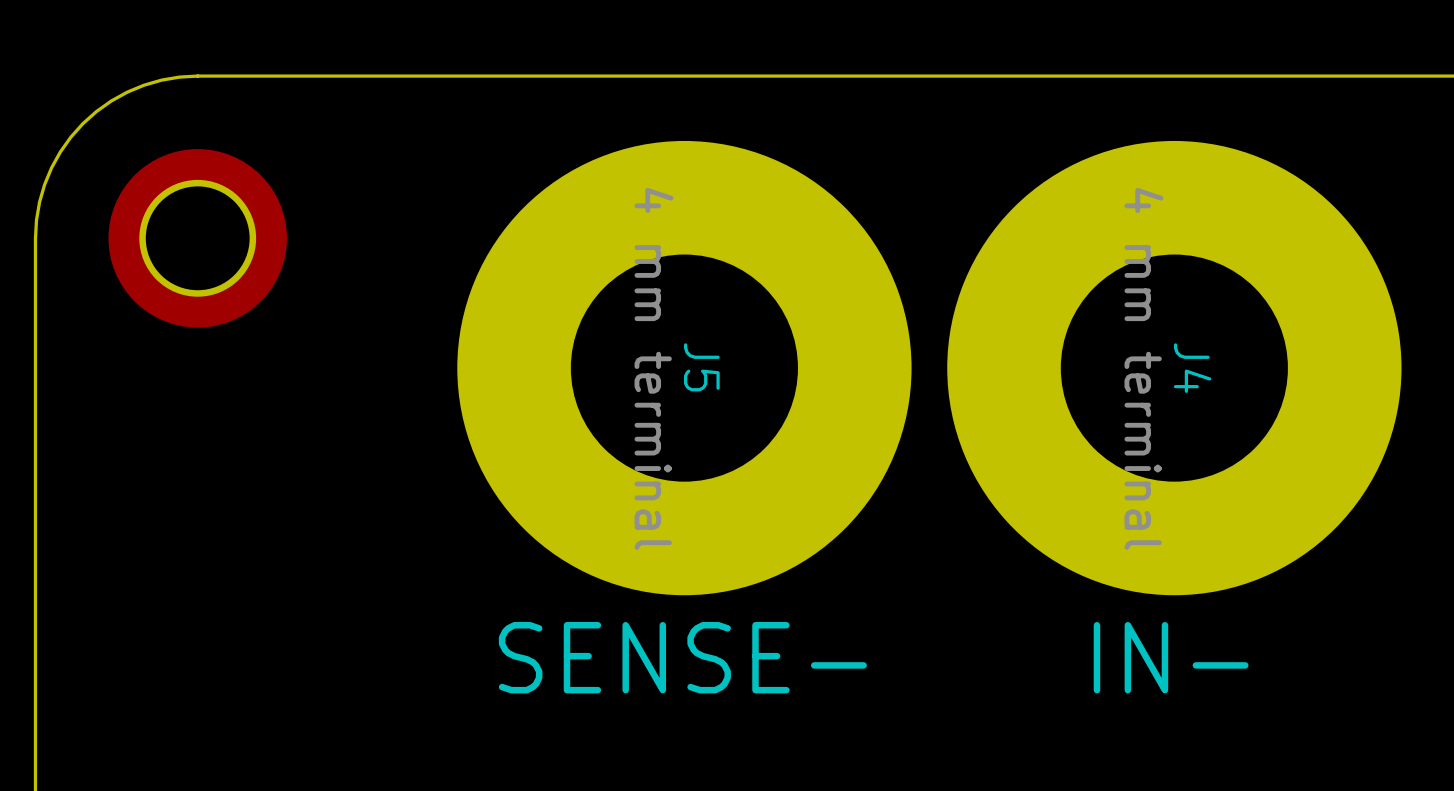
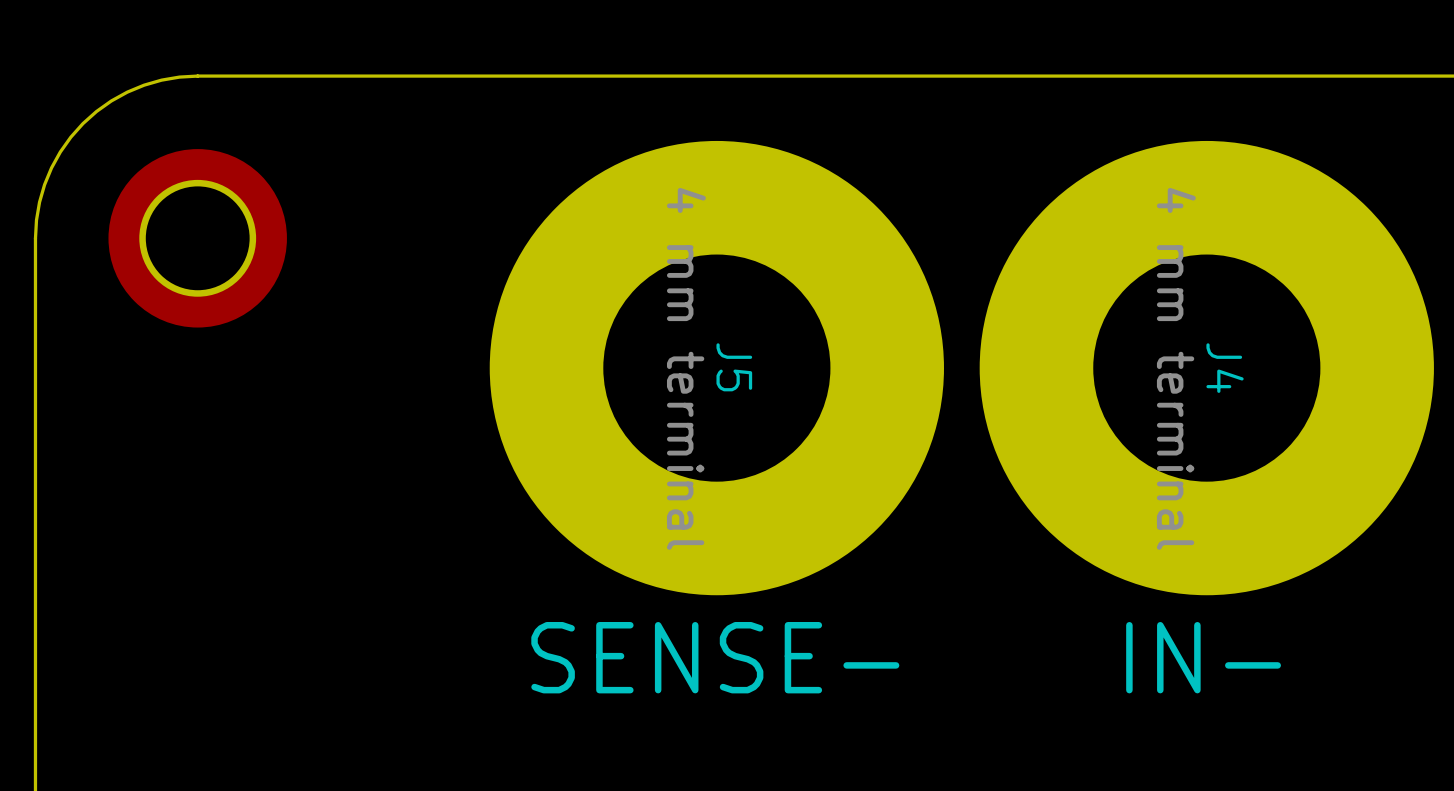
J5 position: (684, 368) -> (716, 368)
J4 position: (1174, 368) -> (1206, 368)
text position: SENSE- (682, 657) -> SENSE- (715, 657)
text position: IN- (1171, 657) -> IN- (1203, 657)

